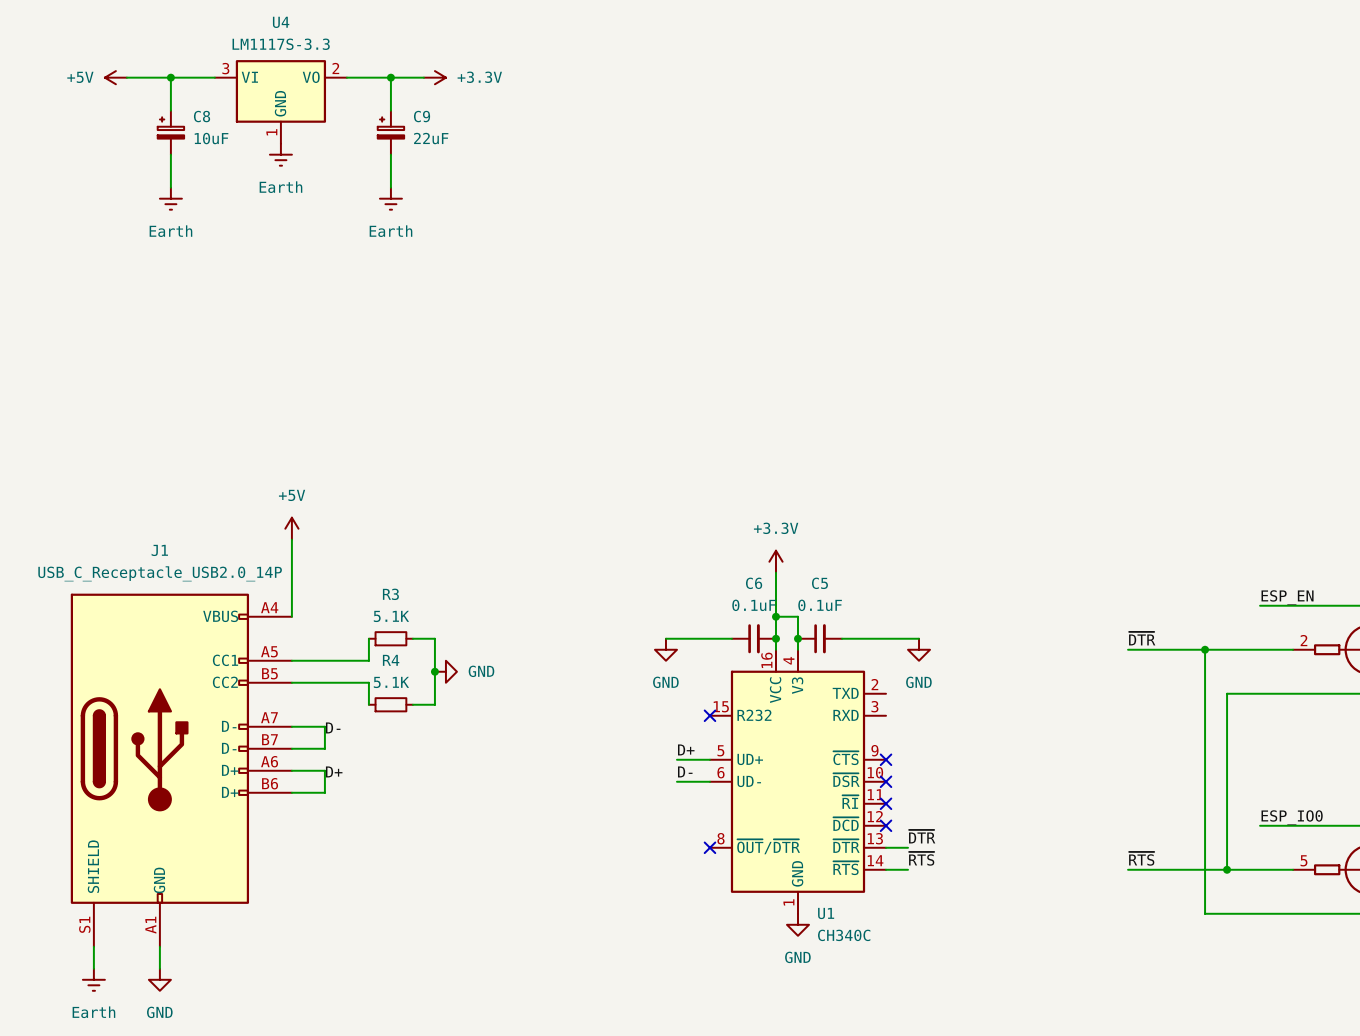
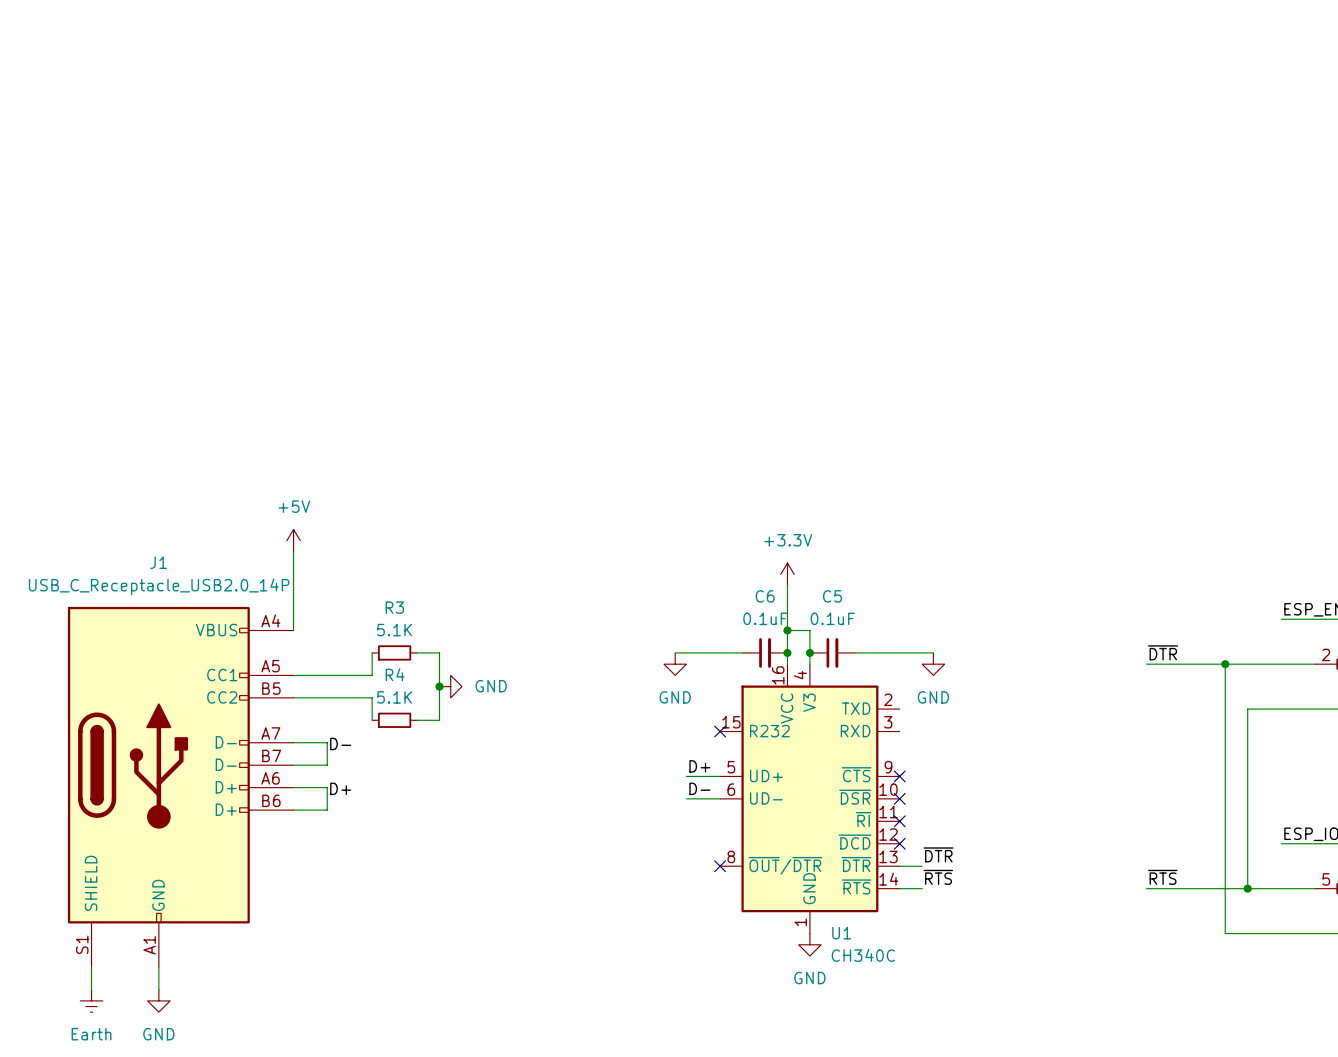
power symbol: +5V (115, 77) -> none
wire: (126, 77) (214, 77) -> none
wire: (170, 77) (170, 110) -> none
junction: (170, 77) -> none
wire: (346, 77) (423, 77) -> none
wire: (390, 77) (390, 110) -> none
junction: (390, 77) -> none
power symbol: +3.3V (434, 77) -> none
U4: LM1117S-3.3 (280, 101) -> none
C8: 10uF (170, 132) -> none
C9: 22uF (390, 132) -> none
wire: (170, 154) (170, 187) -> none
power symbol: Earth (280, 154) -> none
wire: (390, 154) (390, 187) -> none
power symbol: Earth (170, 198) -> none
power symbol: Earth (390, 198) -> none

